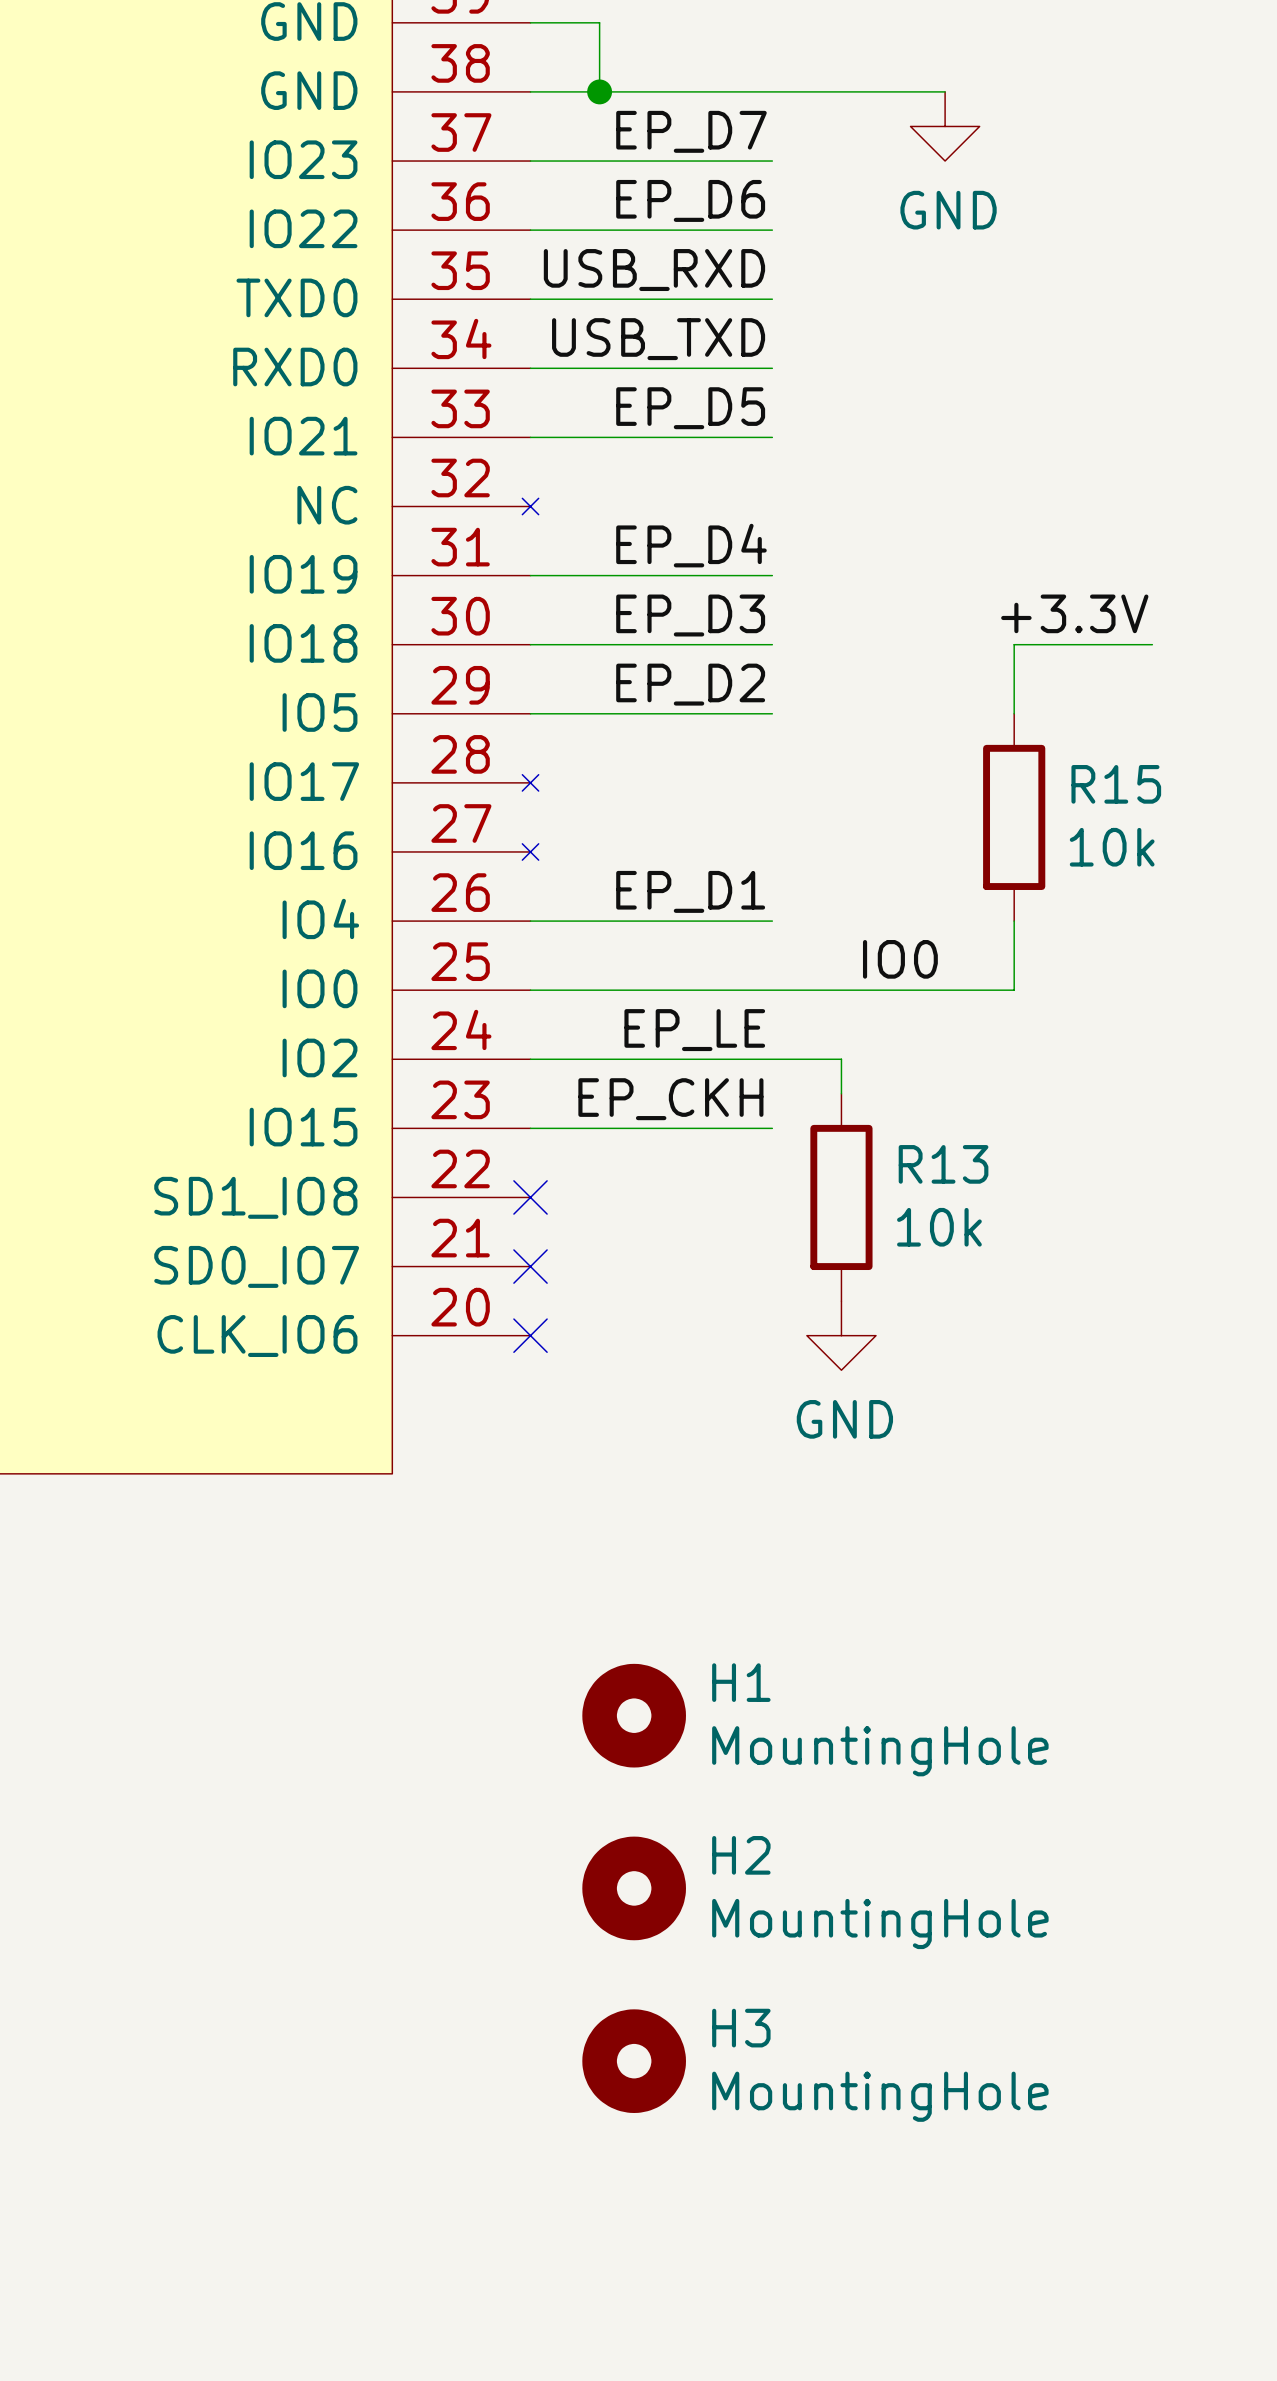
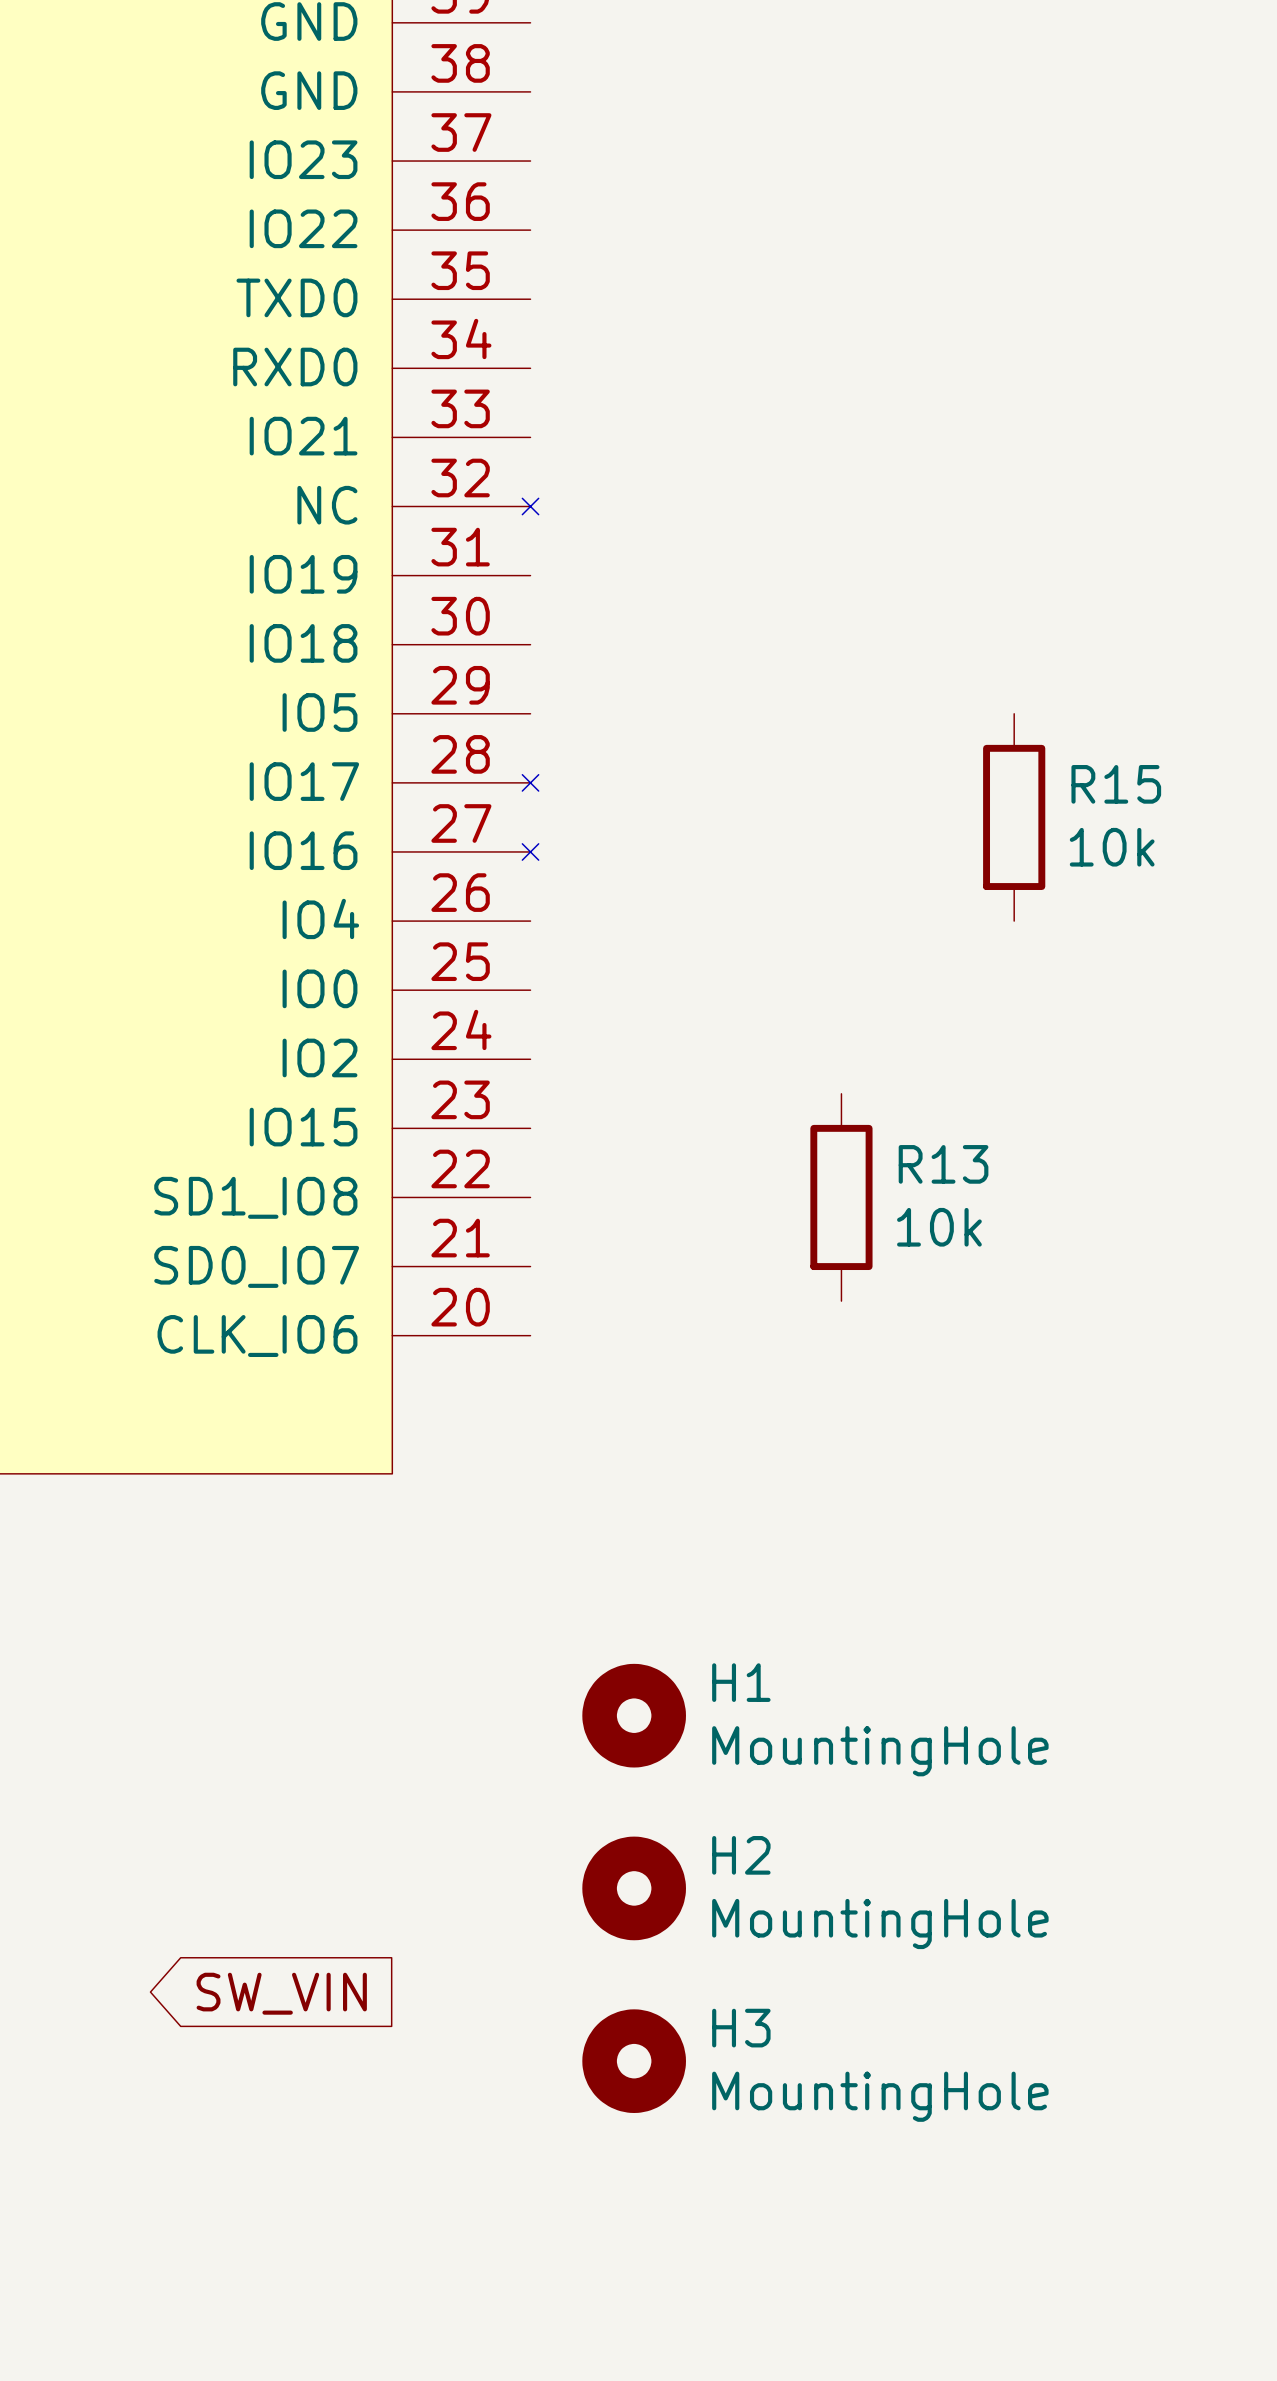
wire: (530, 22) (599, 22) (599, 91) -> none
wire: (530, 91) (945, 91) -> none
junction: (599, 91) -> none
power symbol: GND (945, 126) -> none
label: EP_D7 (691, 131) -> none
wire: (530, 161) (772, 161) -> none
label: EP_D6 (690, 200) -> none
wire: (530, 230) (772, 230) -> none
label: USB_RXD (654, 270) -> none
wire: (530, 299) (772, 299) -> none
label: USB_TXD (658, 339) -> none
wire: (530, 368) (772, 368) -> none
label: EP_D5 (690, 408) -> none
wire: (530, 437) (772, 437) -> none
label: EP_D4 (691, 545) -> none
wire: (530, 575) (772, 575) -> none
label: +3.3V (1074, 613) -> none
label: EP_D3 (690, 615) -> none
wire: (530, 644) (772, 644) -> none
wire: (1152, 644) (1014, 644) (1014, 713) -> none
label: EP_D2 (690, 684) -> none
wire: (530, 713) (772, 713) -> none
label: EP_D1 (690, 891) -> none
wire: (530, 921) (772, 921) -> none
wire: (1014, 921) (1014, 990) (530, 990) -> none
label: IO0 (900, 959) -> none
label: EP_LE (694, 1030) -> none
wire: (530, 1059) (841, 1059) (841, 1093) -> none
label: EP_CKH (670, 1099) -> none
wire: (530, 1128) (772, 1128) -> none
no-connect mark: (530, 1197) -> none
no-connect mark: (530, 1266) -> none
no-connect mark: (530, 1335) -> none
power symbol: GND (841, 1335) -> none
global label: none -> SW_VIN (281, 1993)

